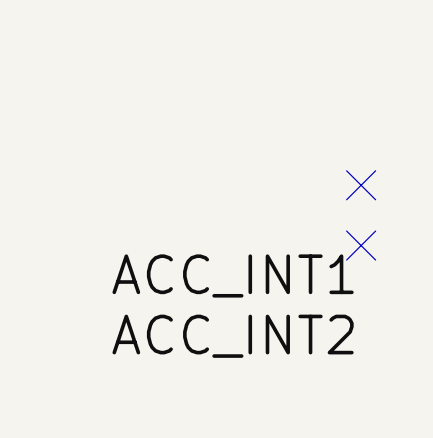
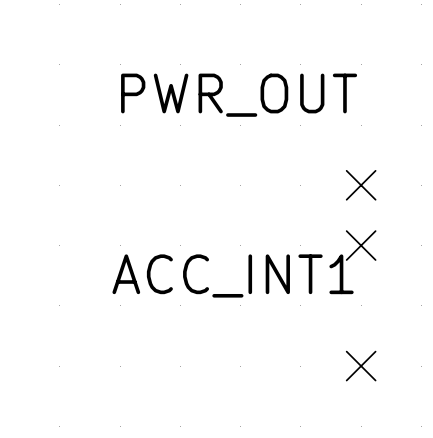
label: none -> PWR_OUT (239, 95)
label: ACC_INT2 (233, 336) -> none
no-connect mark: none -> (361, 366)

